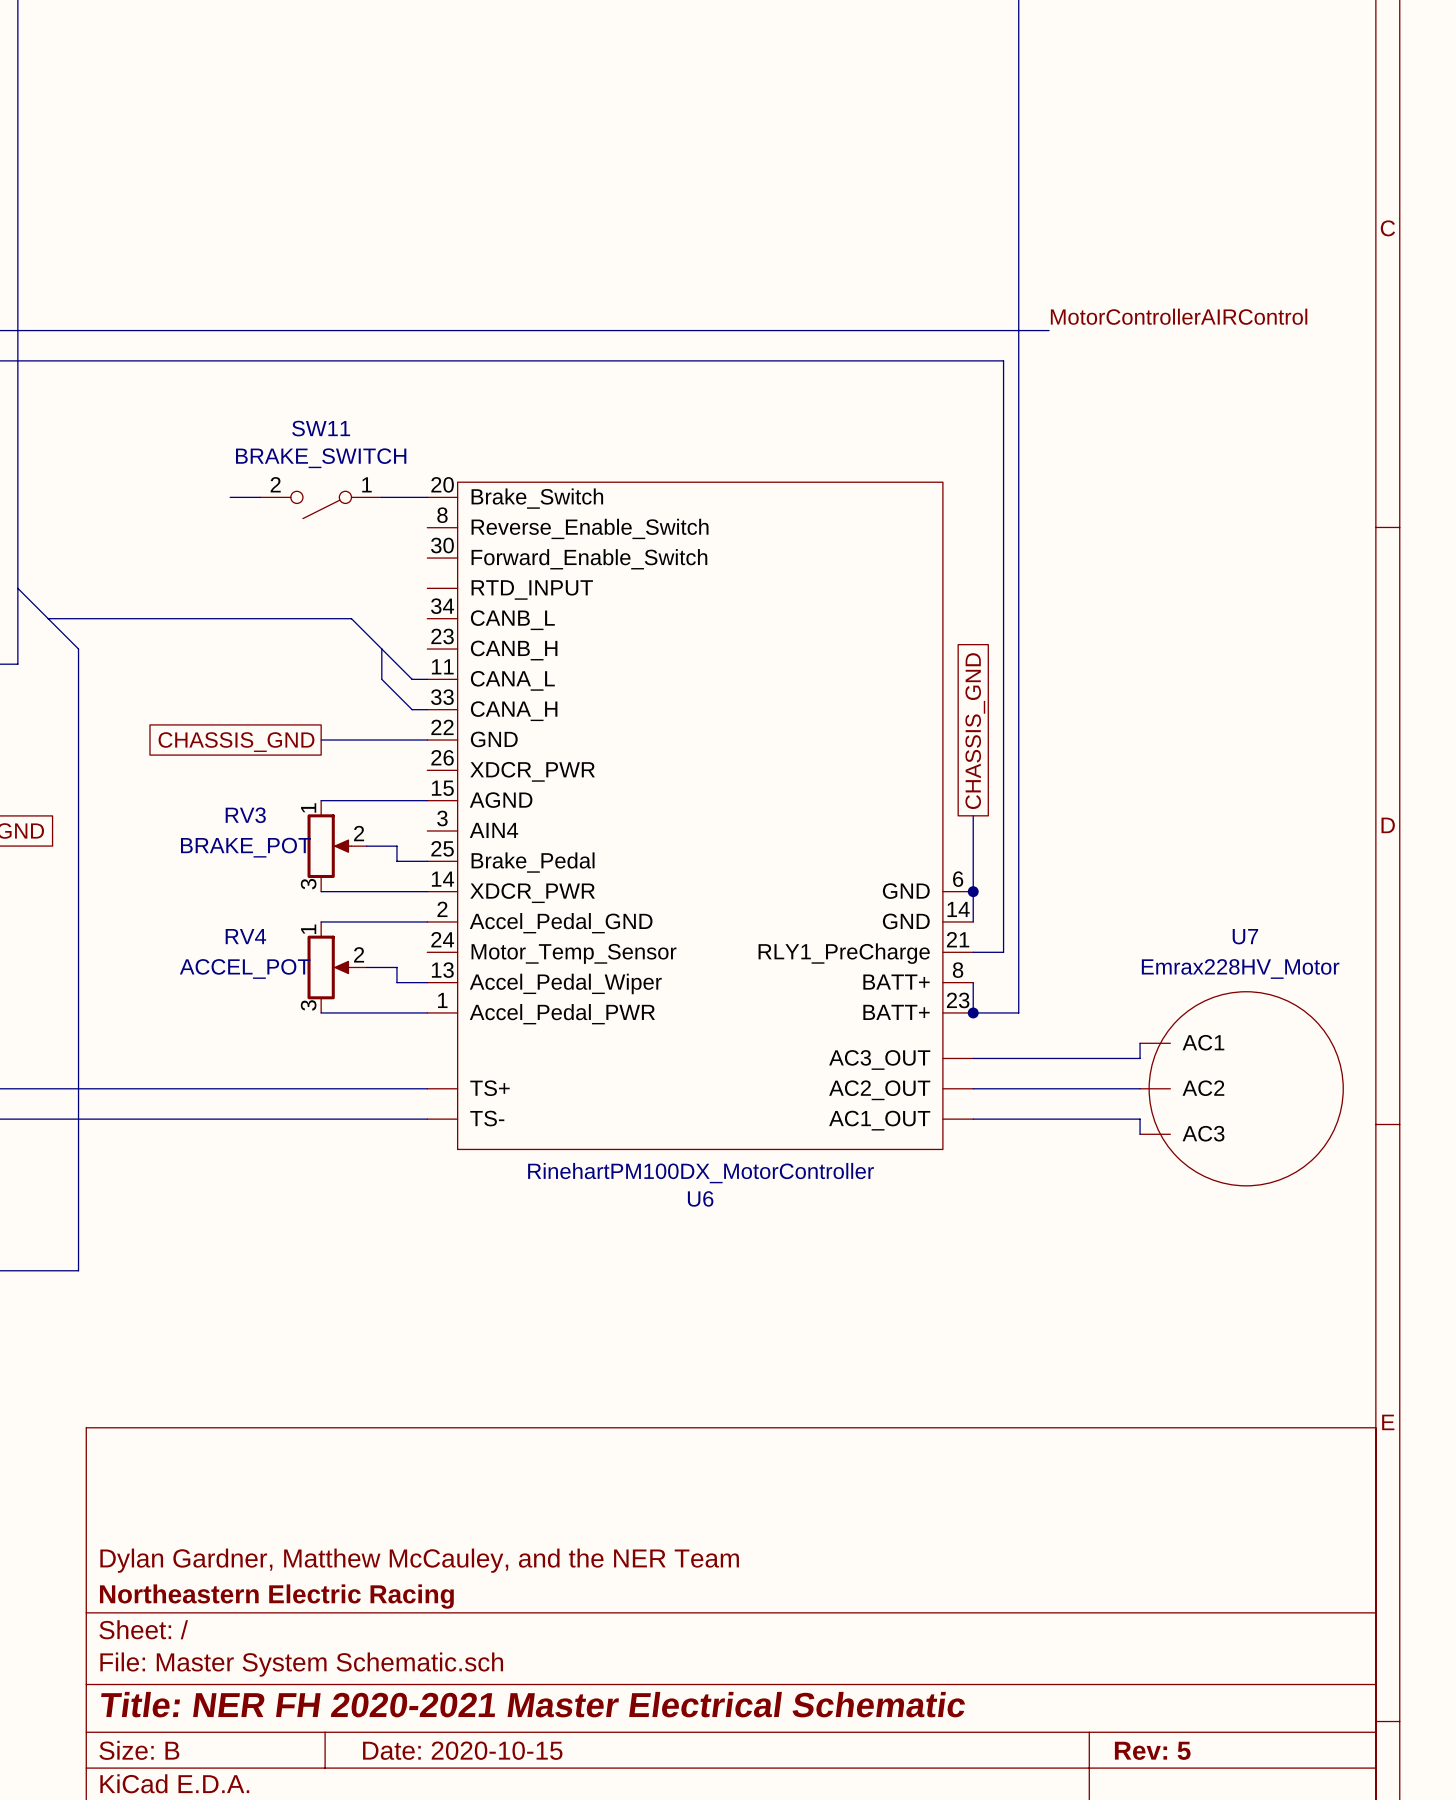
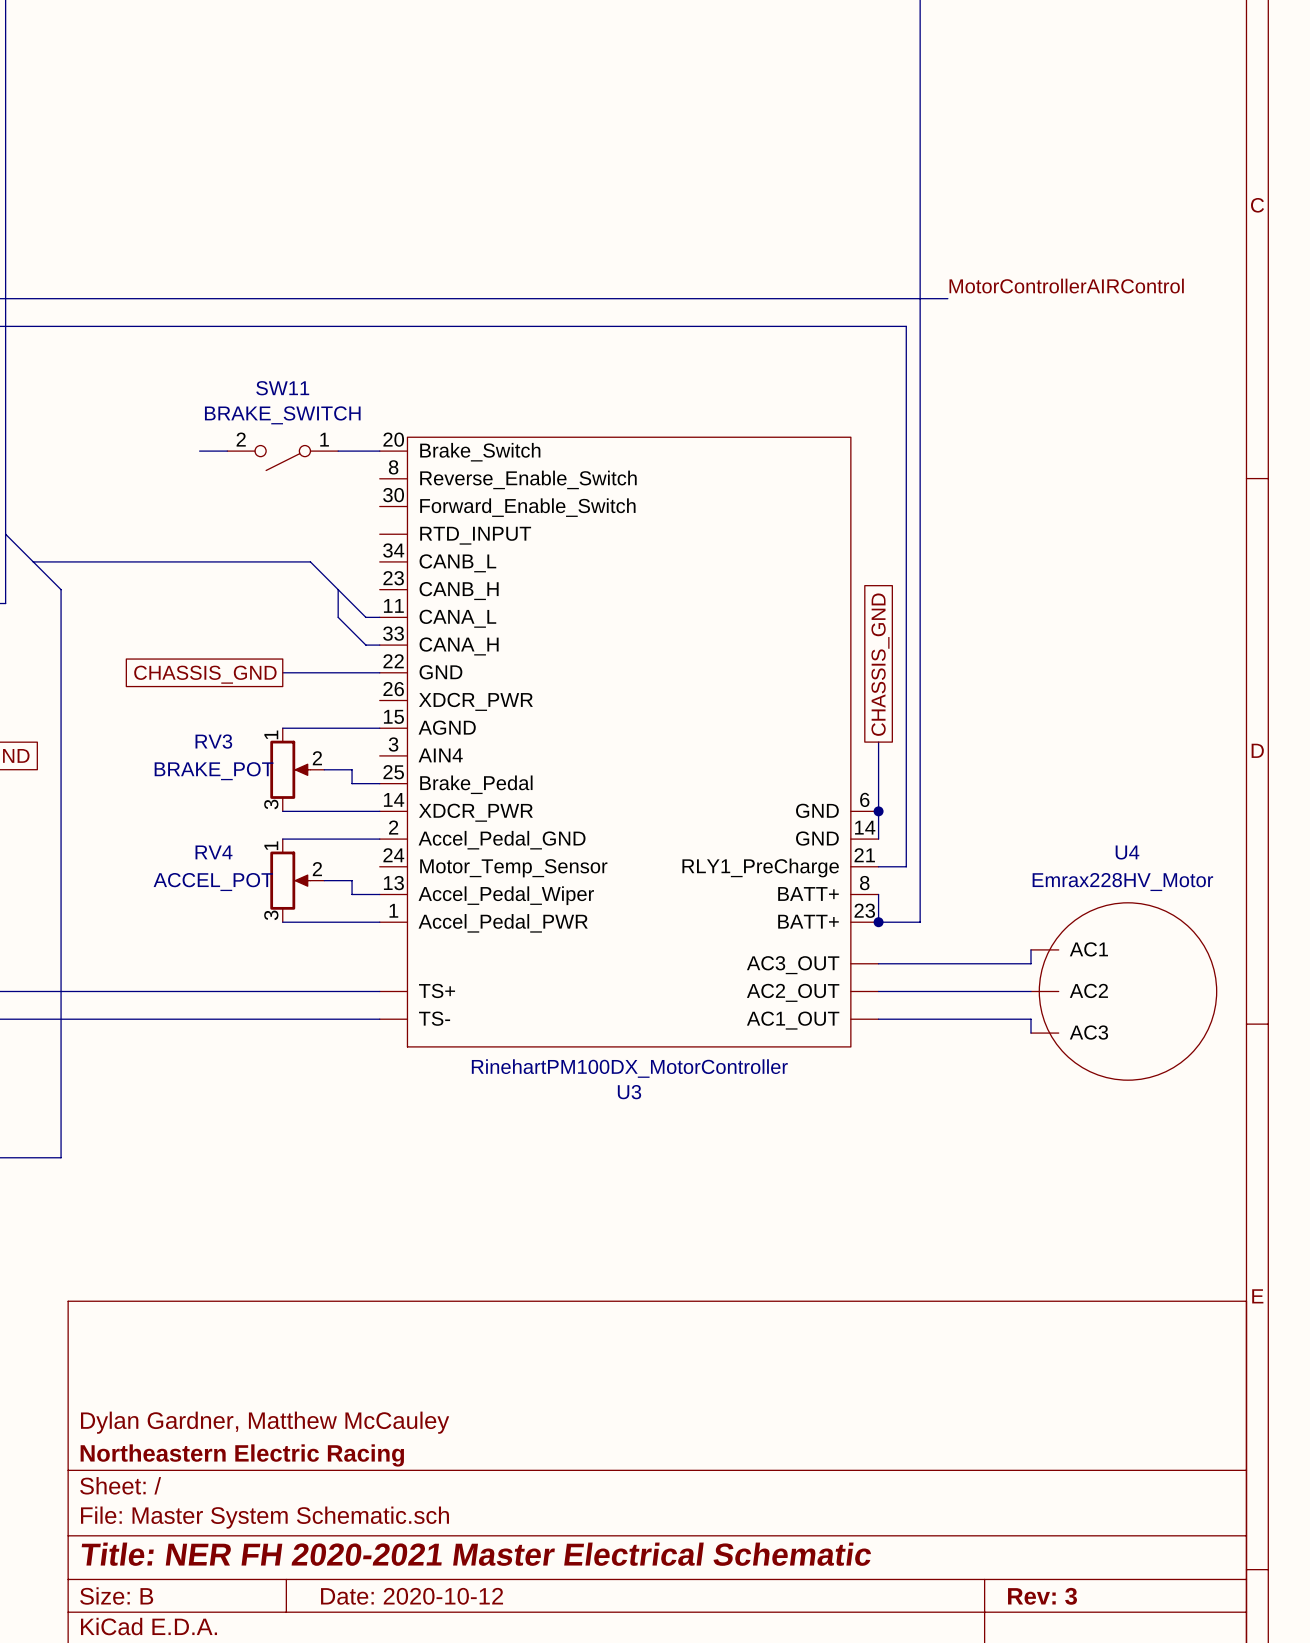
U7 name: U7 (1245, 936) -> U4 (1127, 852)
U6 name: U6 (700, 1198) -> U3 (629, 1092)
title block: Dylan Gardner, Matthew McCauley, and the NER Team (419, 1560) -> Dylan Gardner, Matthew McCauley (265, 1422)
title block: Date: 2020-10-15 (462, 1750) -> Date: 2020-10-12 (412, 1596)
title block: Rev: 5 (1152, 1750) -> Rev: 3 (1042, 1596)

